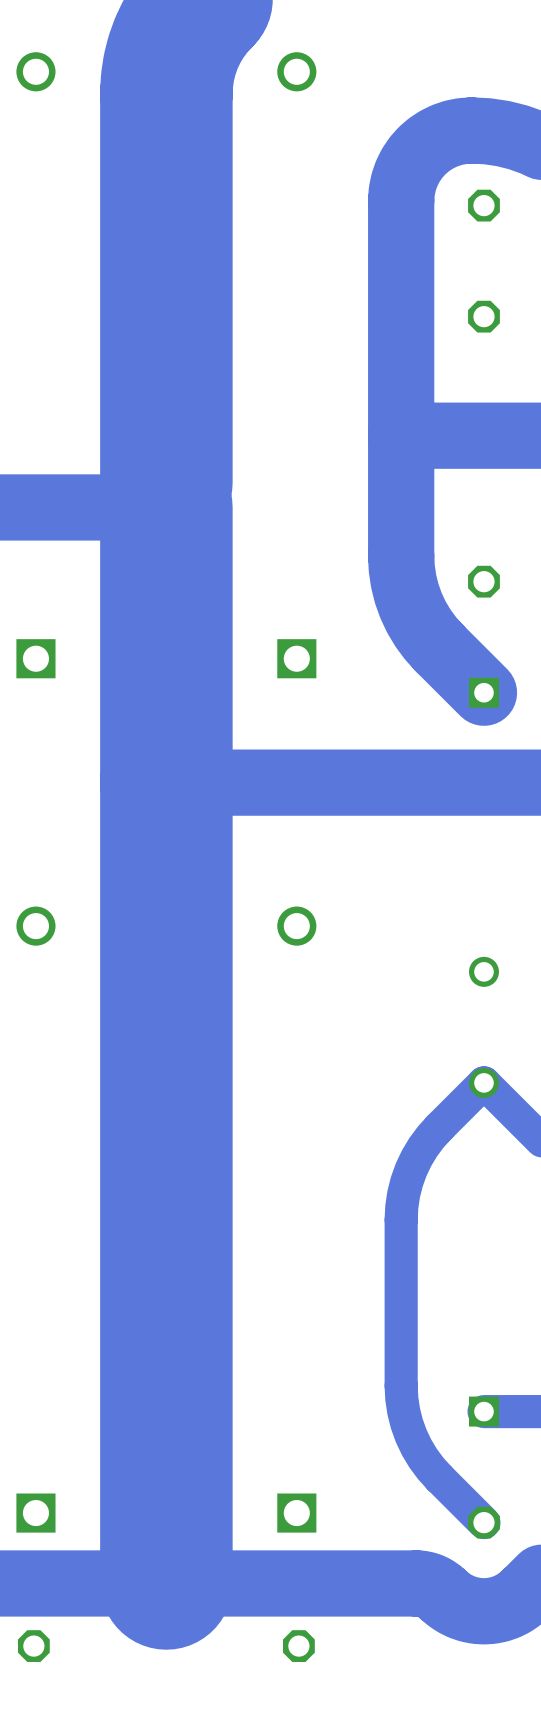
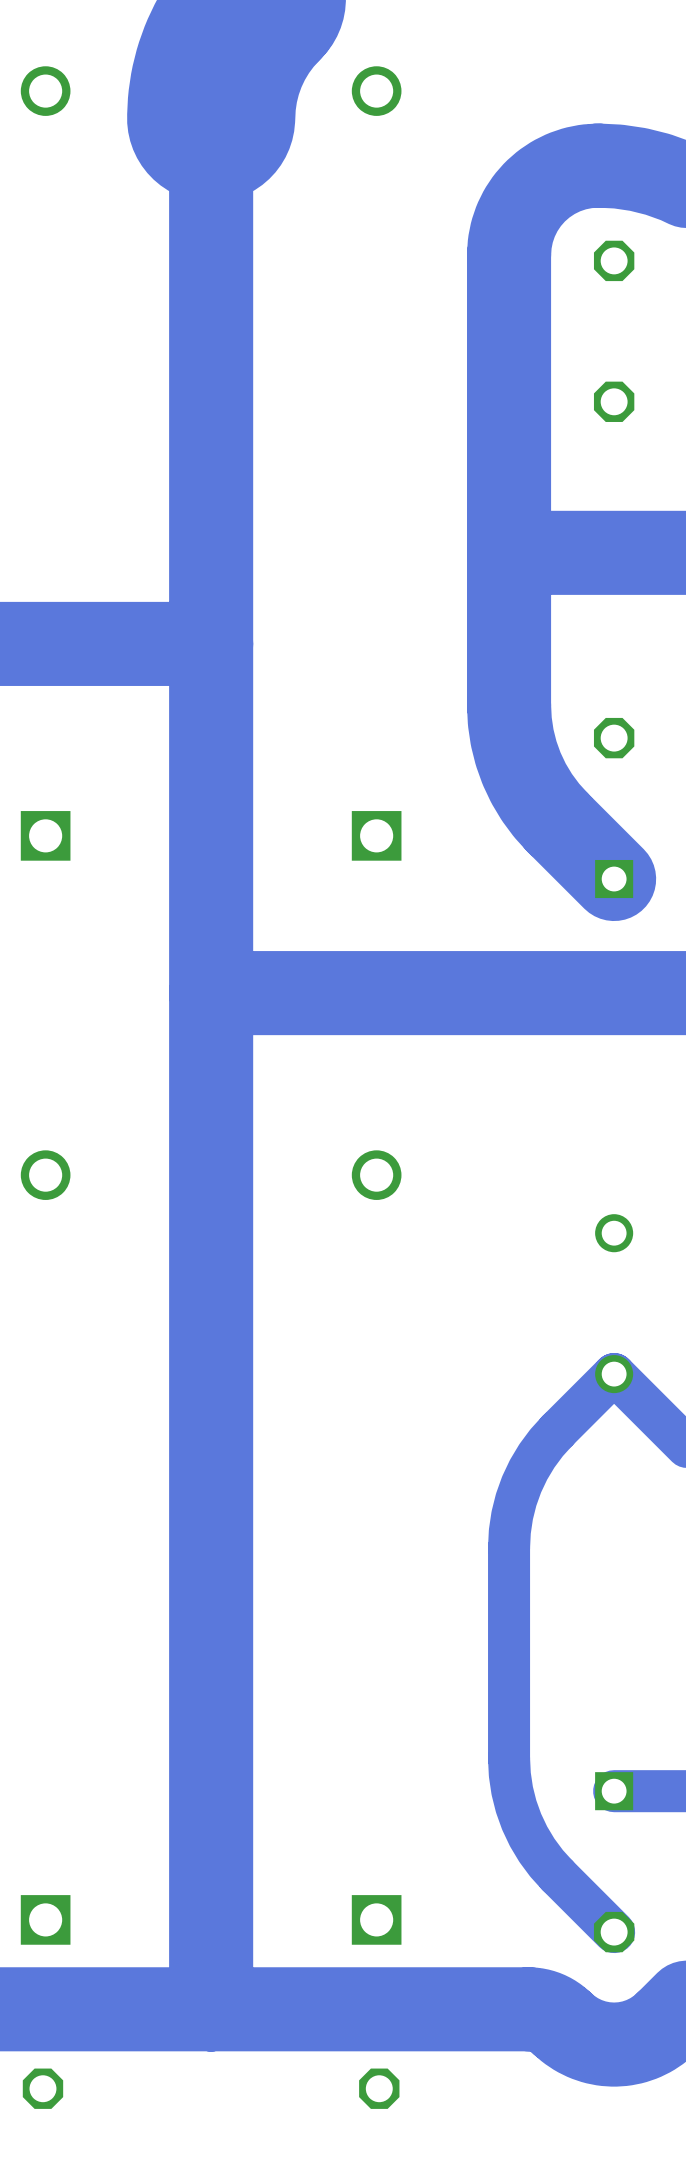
track width: thick (166, 93) (166, 482) -> thin (211, 118) (211, 612)
track width: thick (166, 507) (166, 1583) -> thin (211, 643) (211, 2009)

